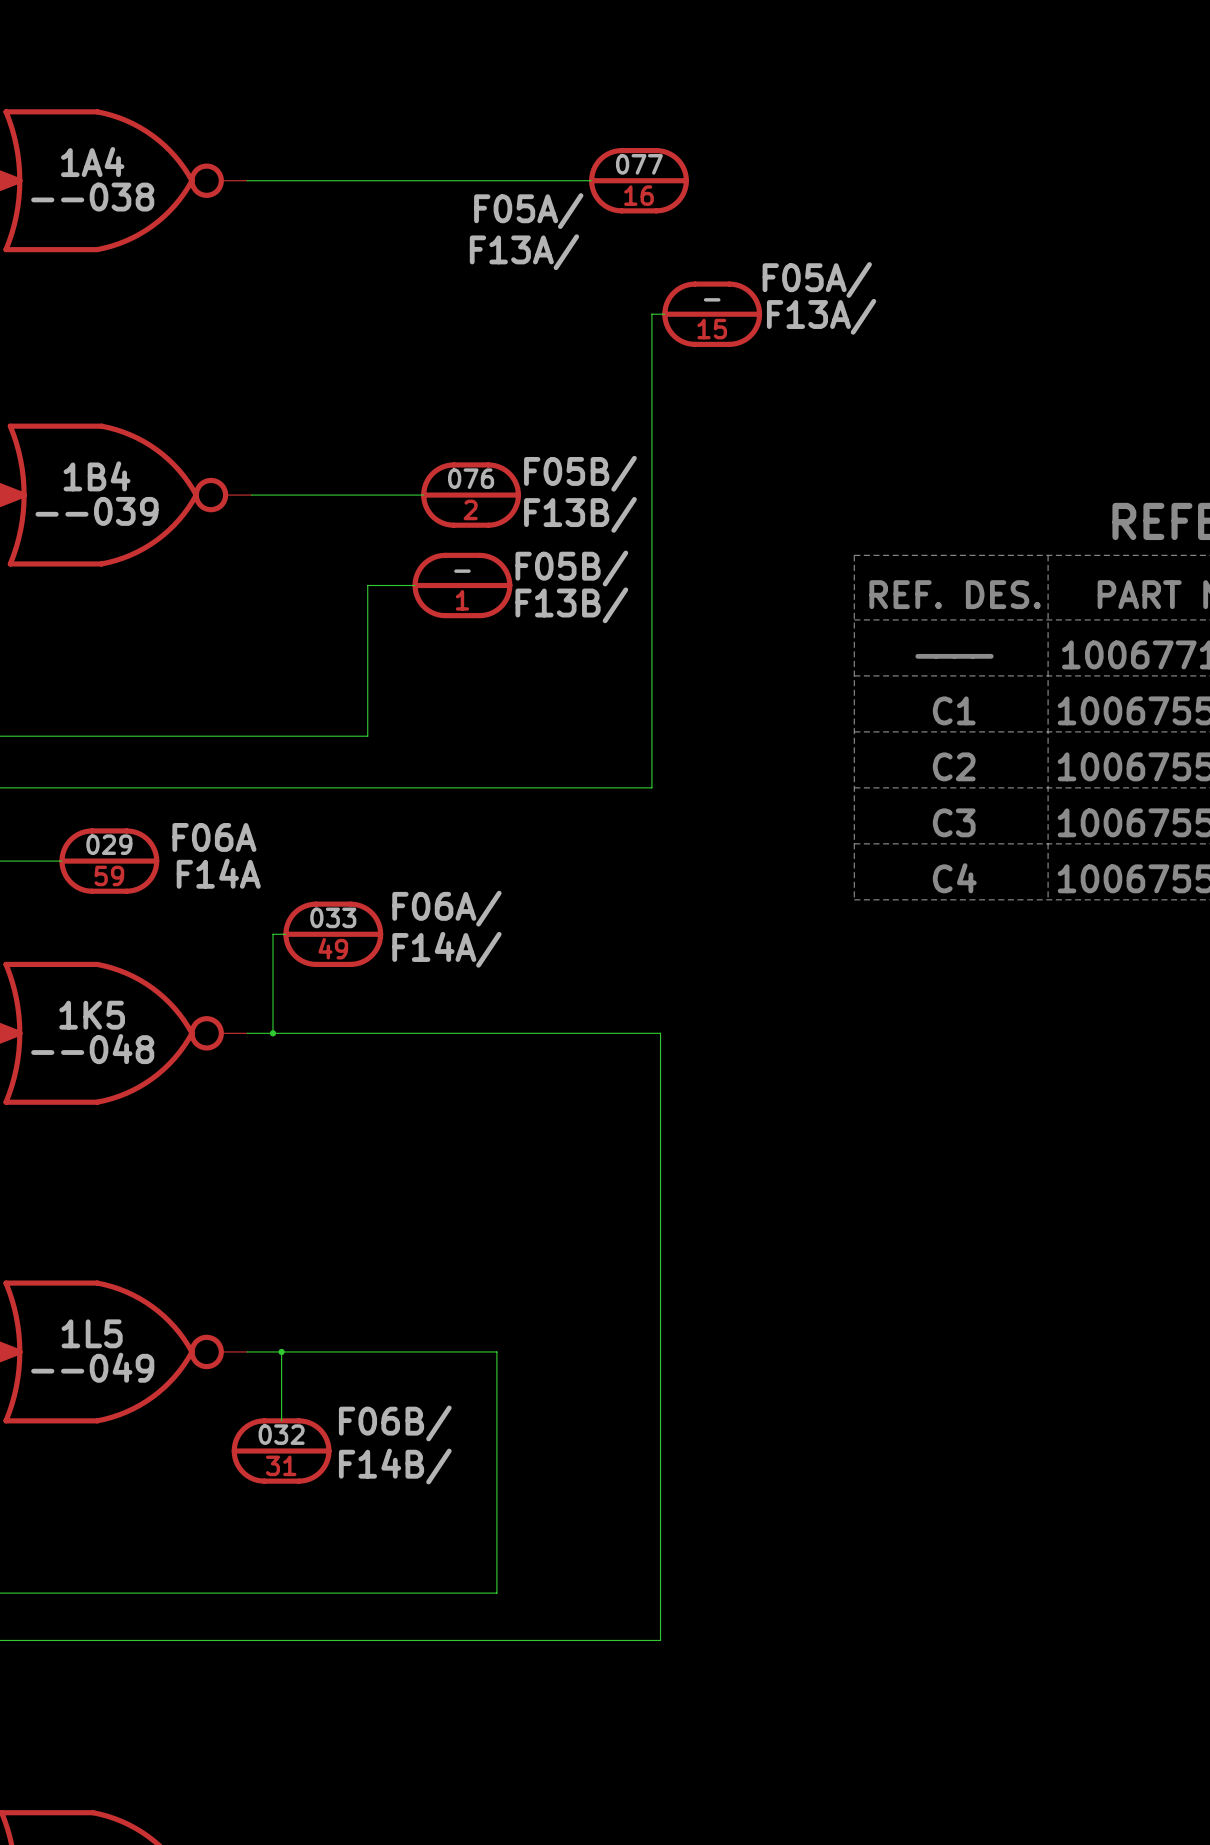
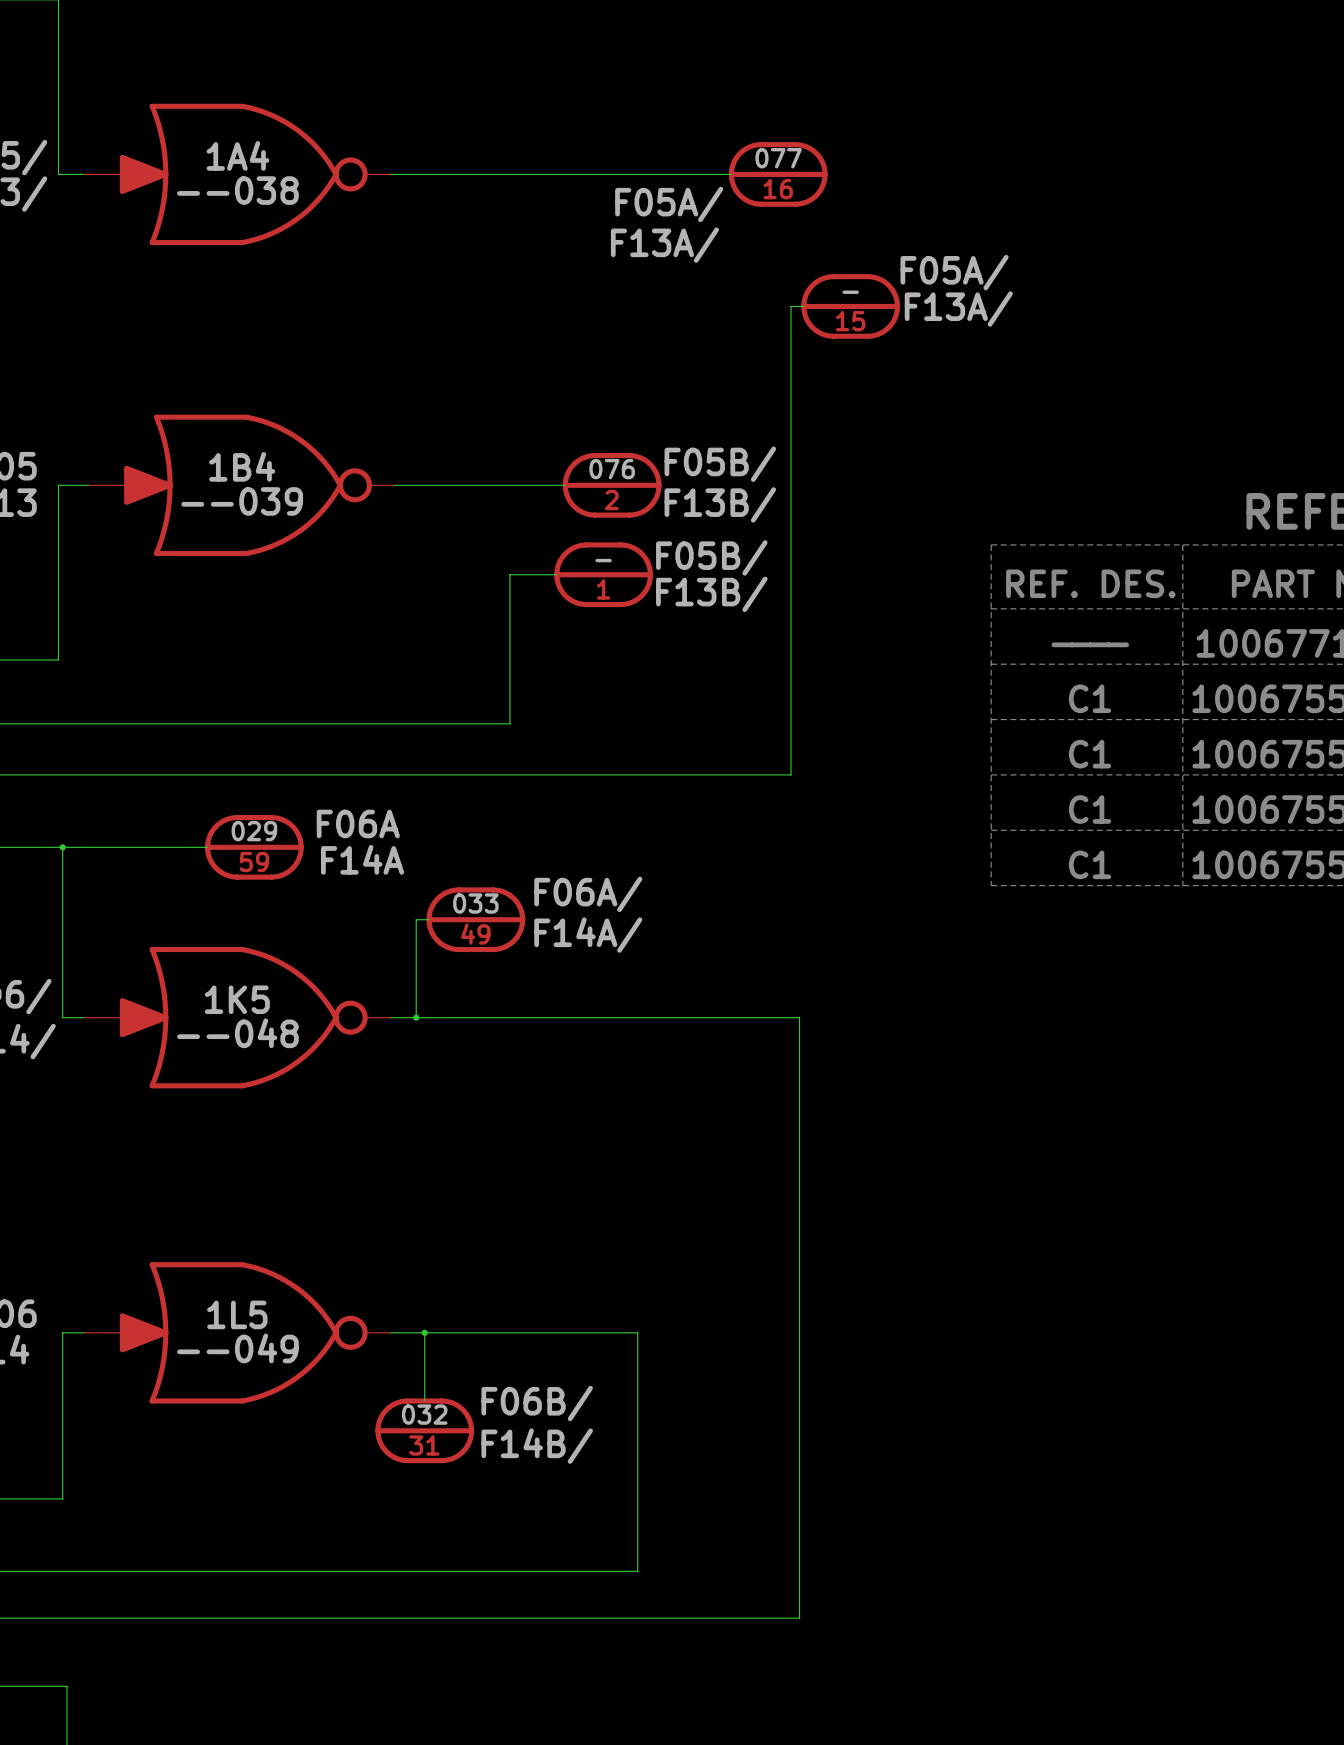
text: C2 (954, 766) -> C1 (1090, 754)
text: C3 (954, 822) -> C1 (1090, 809)
text: C4 (954, 878) -> C1 (1090, 864)

